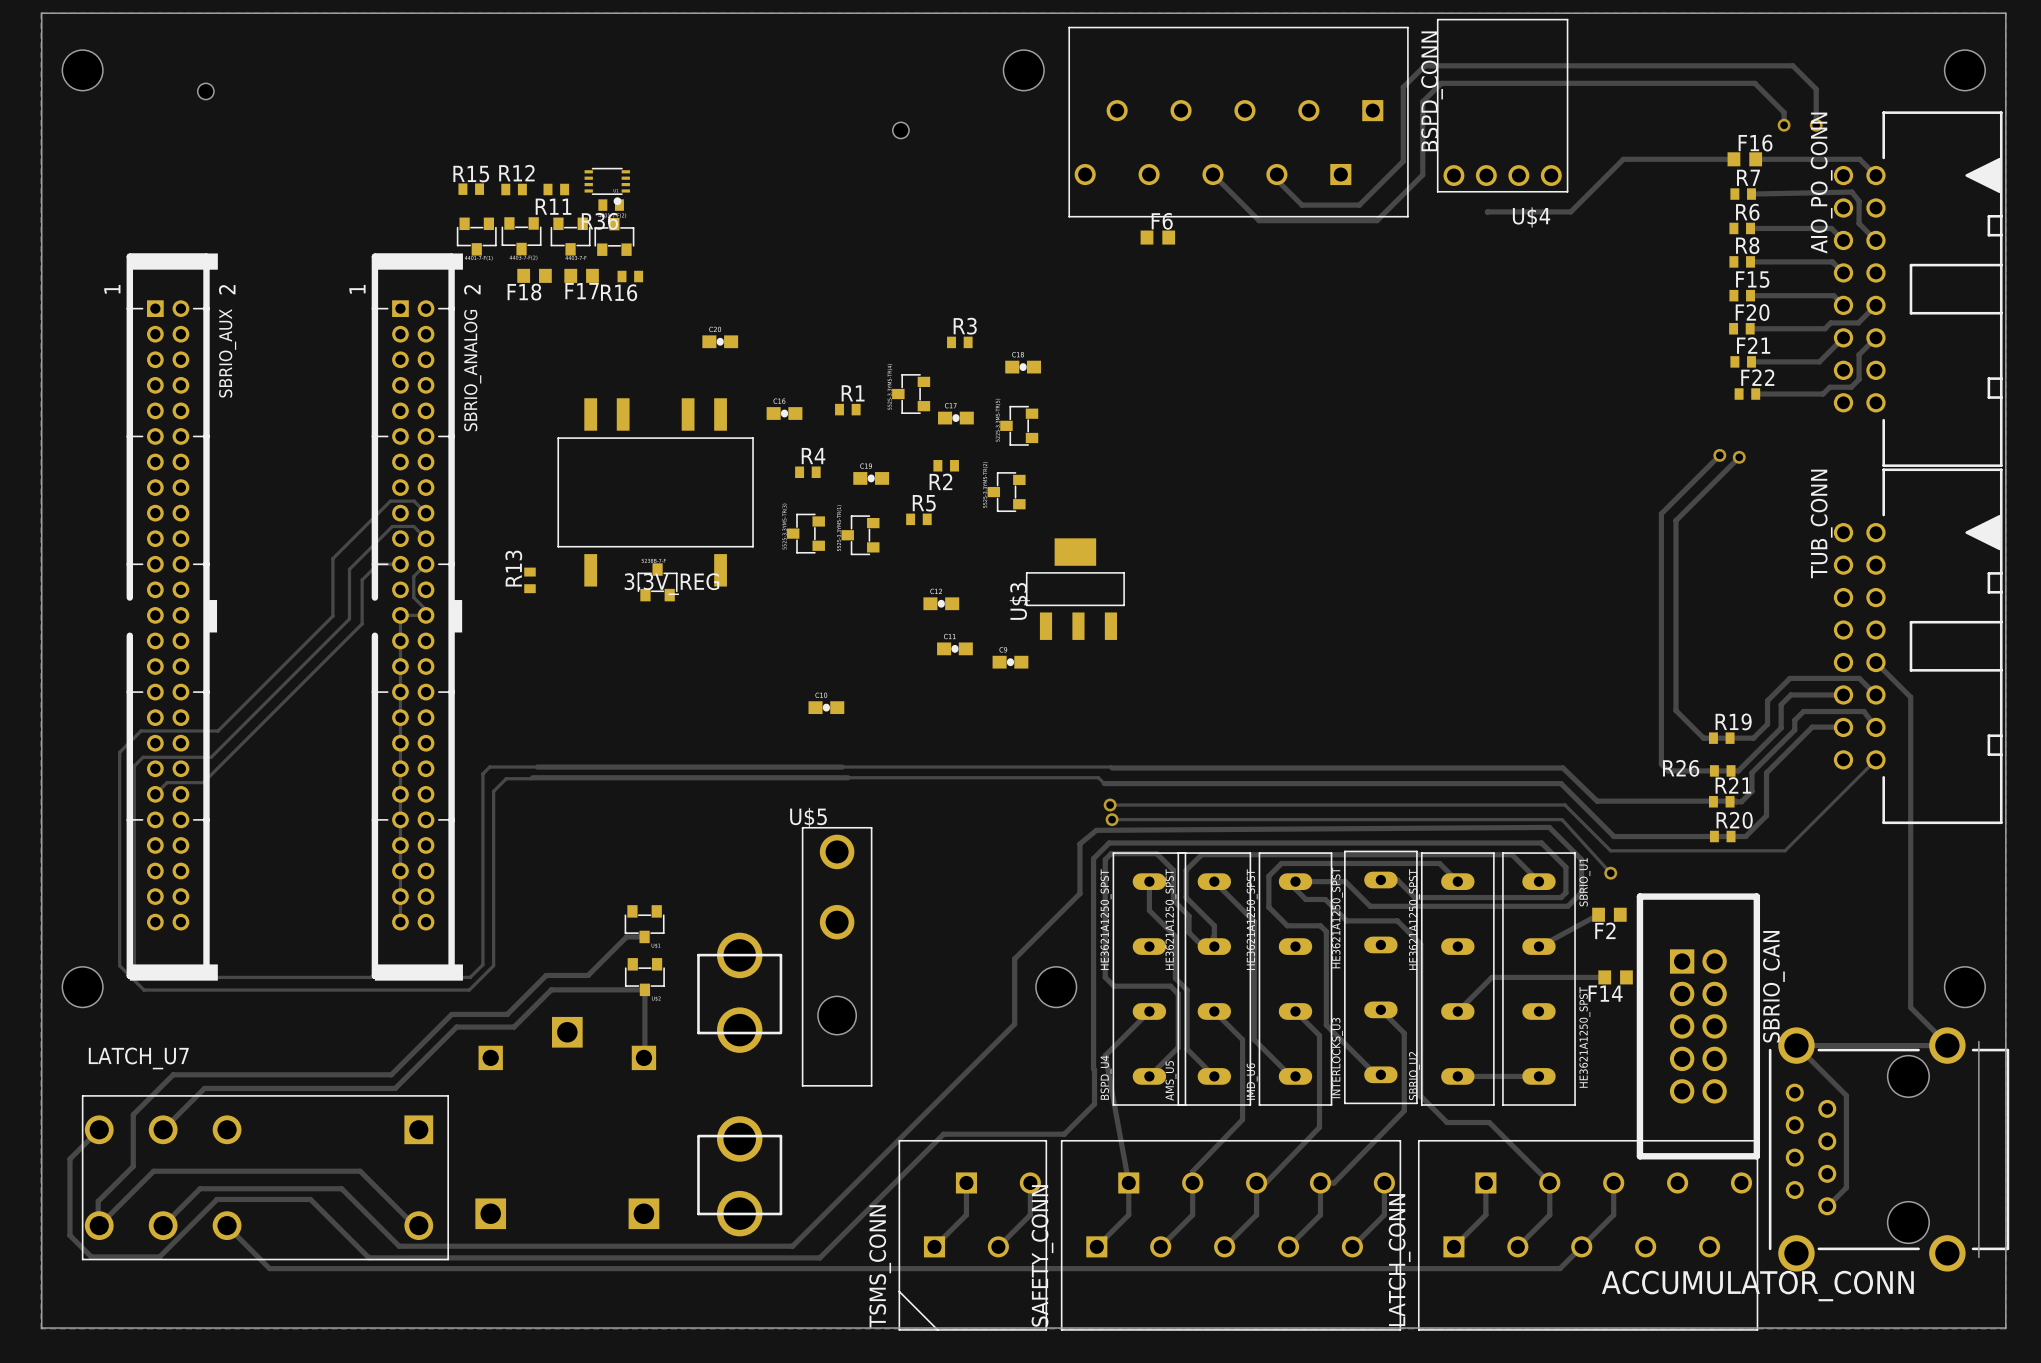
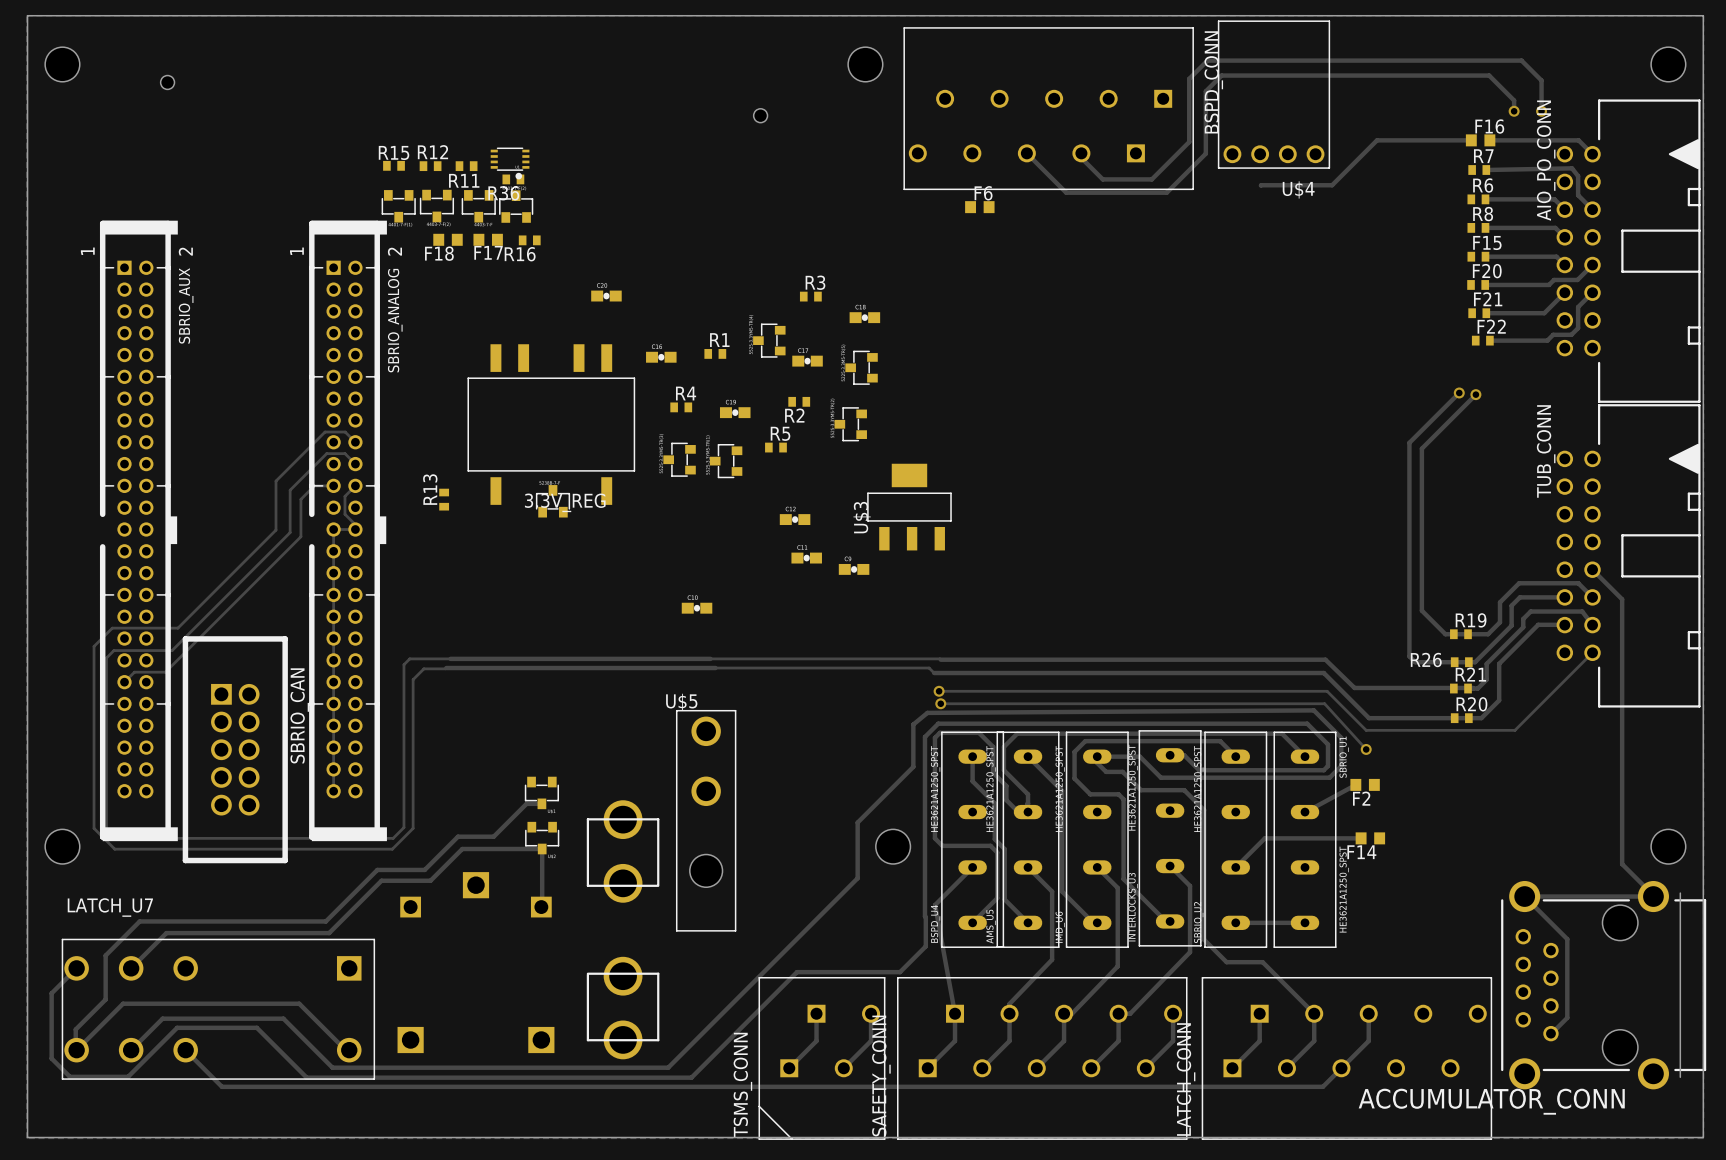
SBRIO_CAN: none -> (235, 749)
SBRIO_CAN: (1698, 1026) -> none

